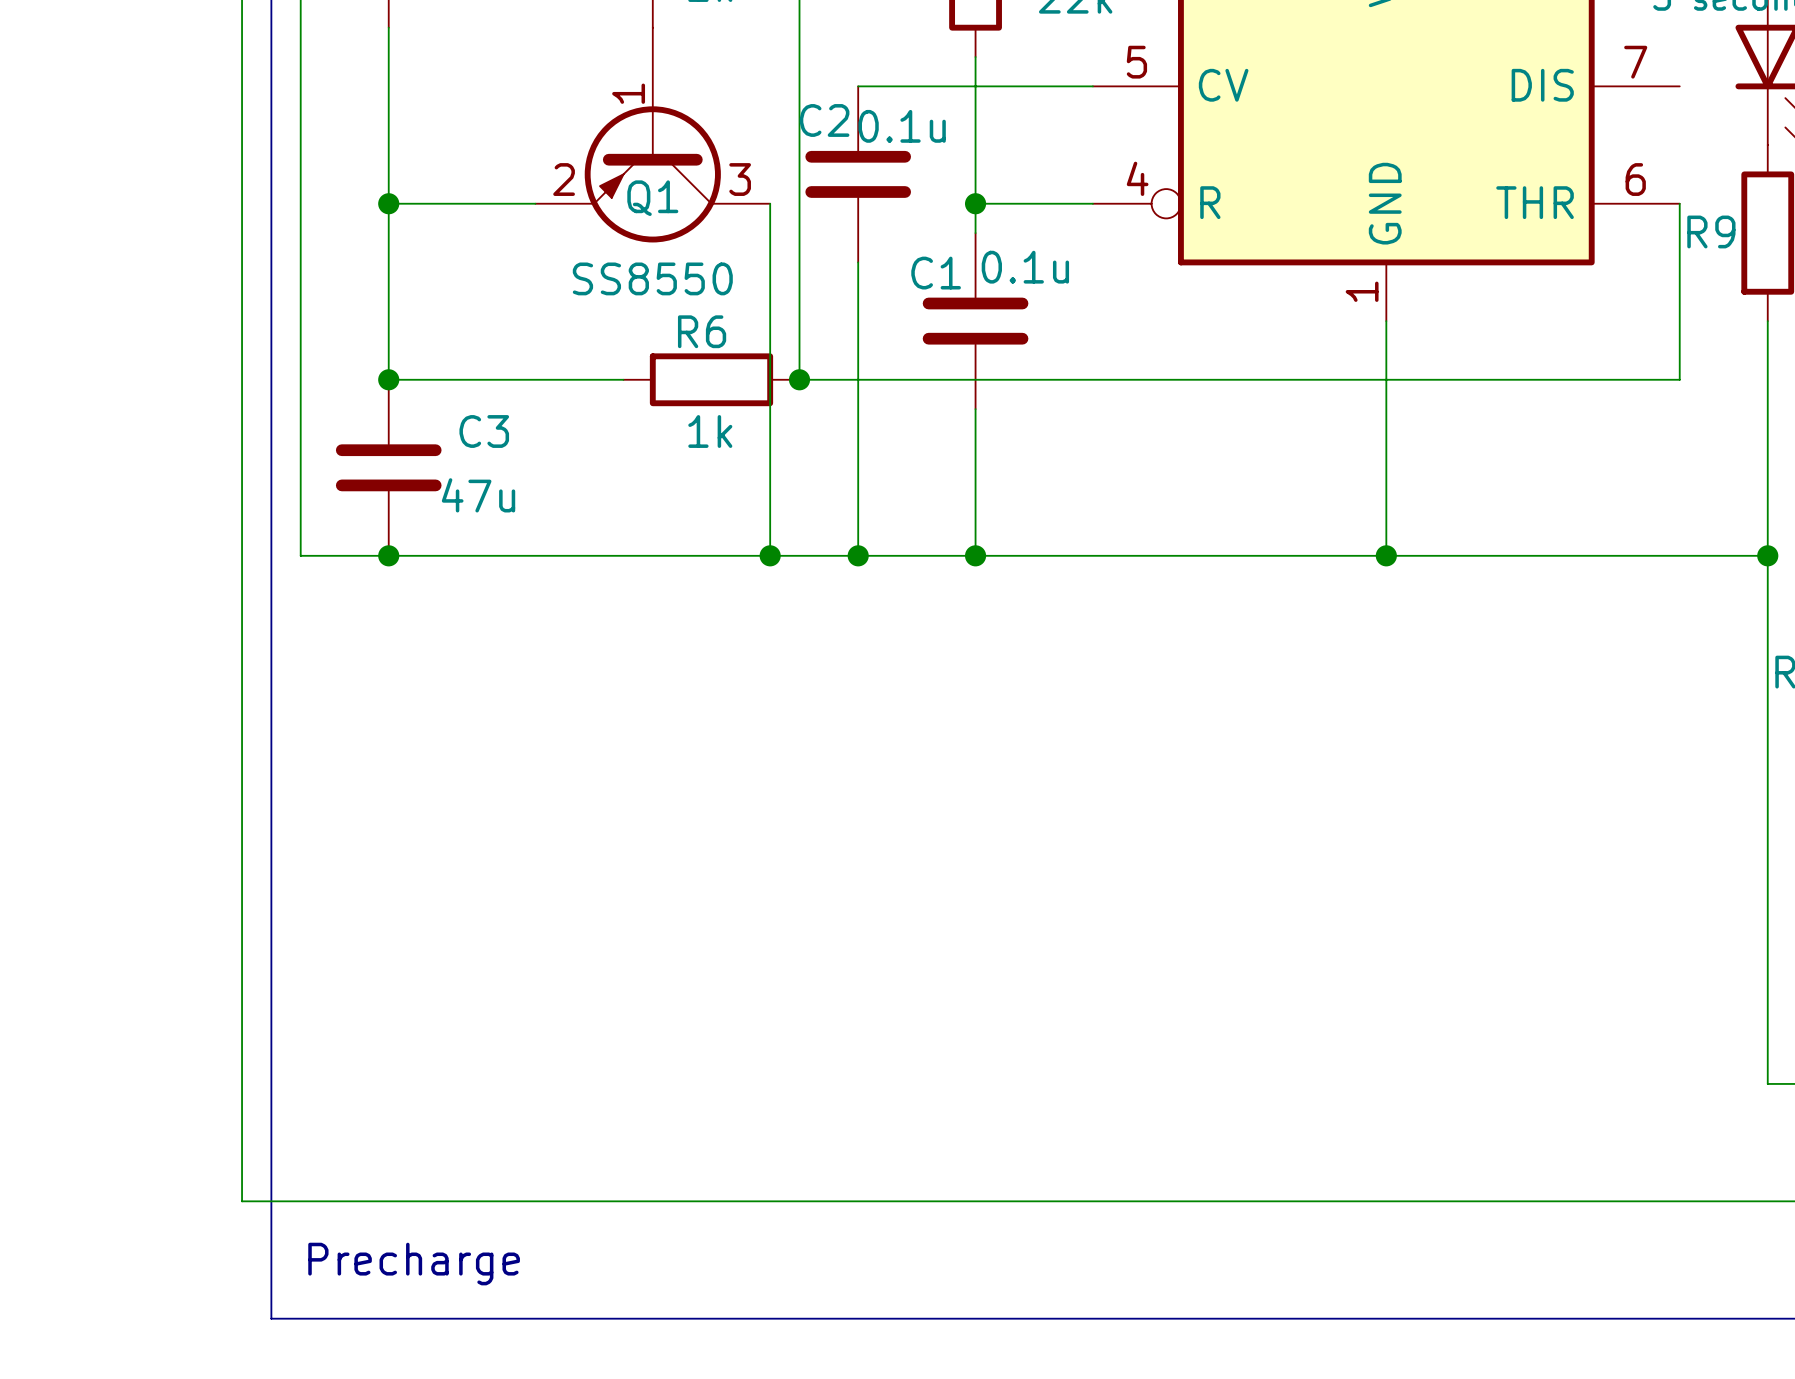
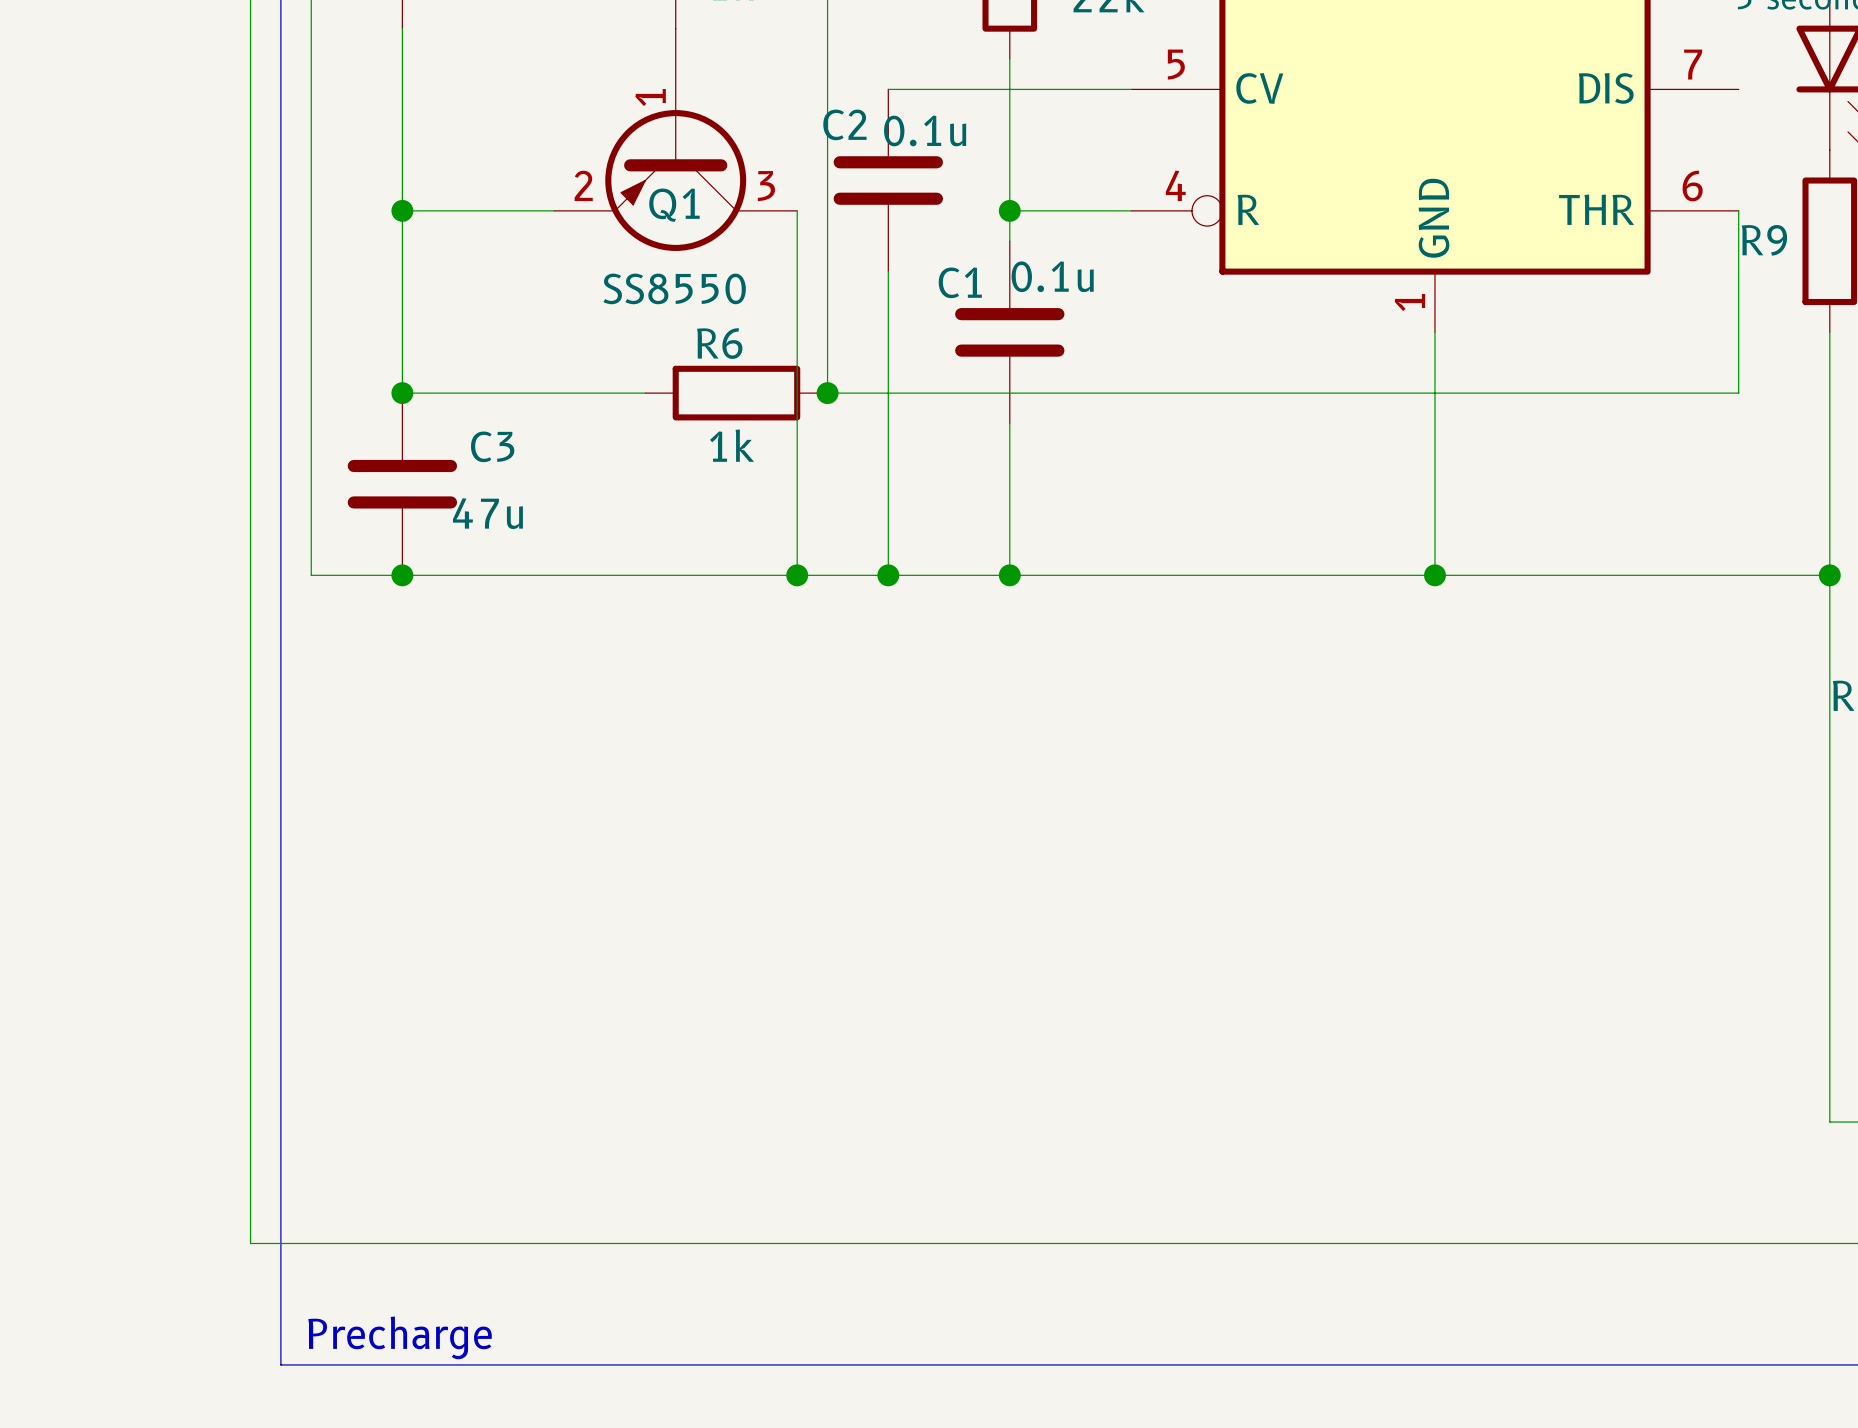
text position: Precharge (414, 1264) -> Precharge (400, 1337)

